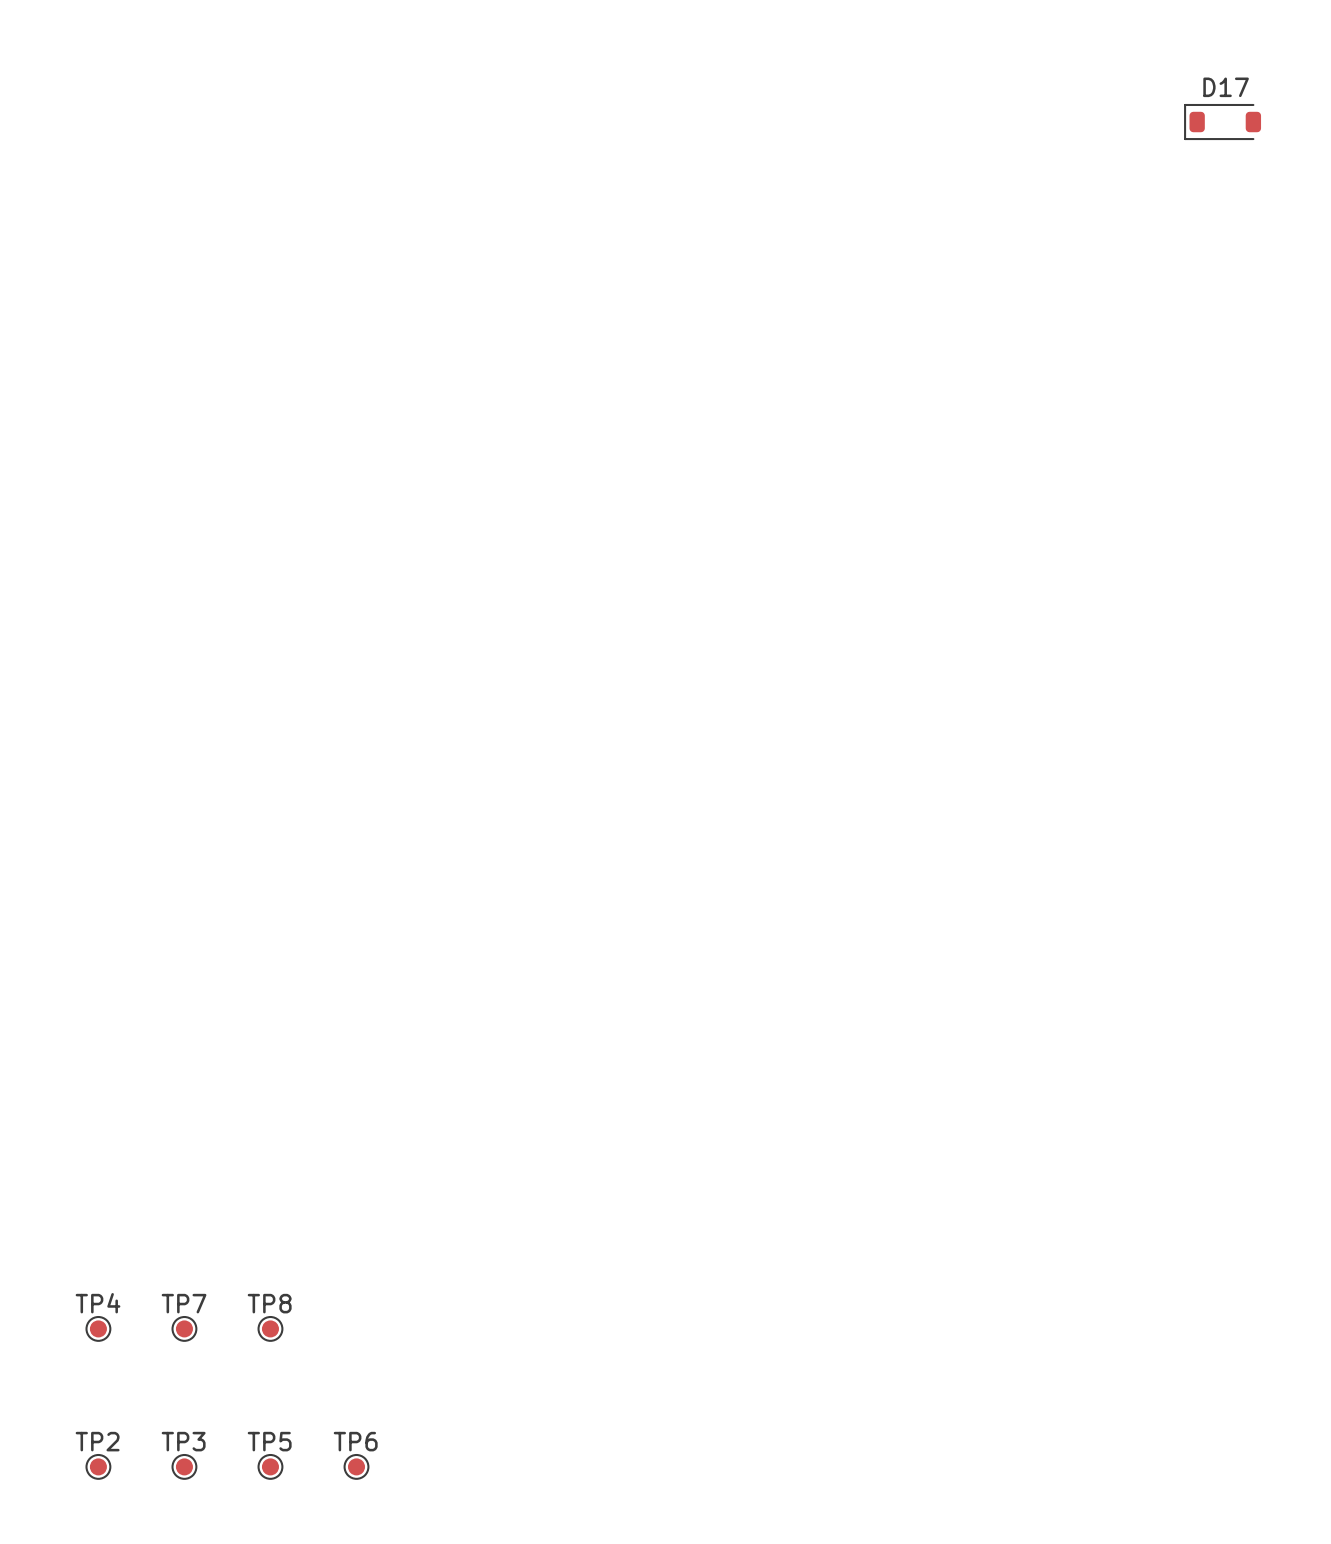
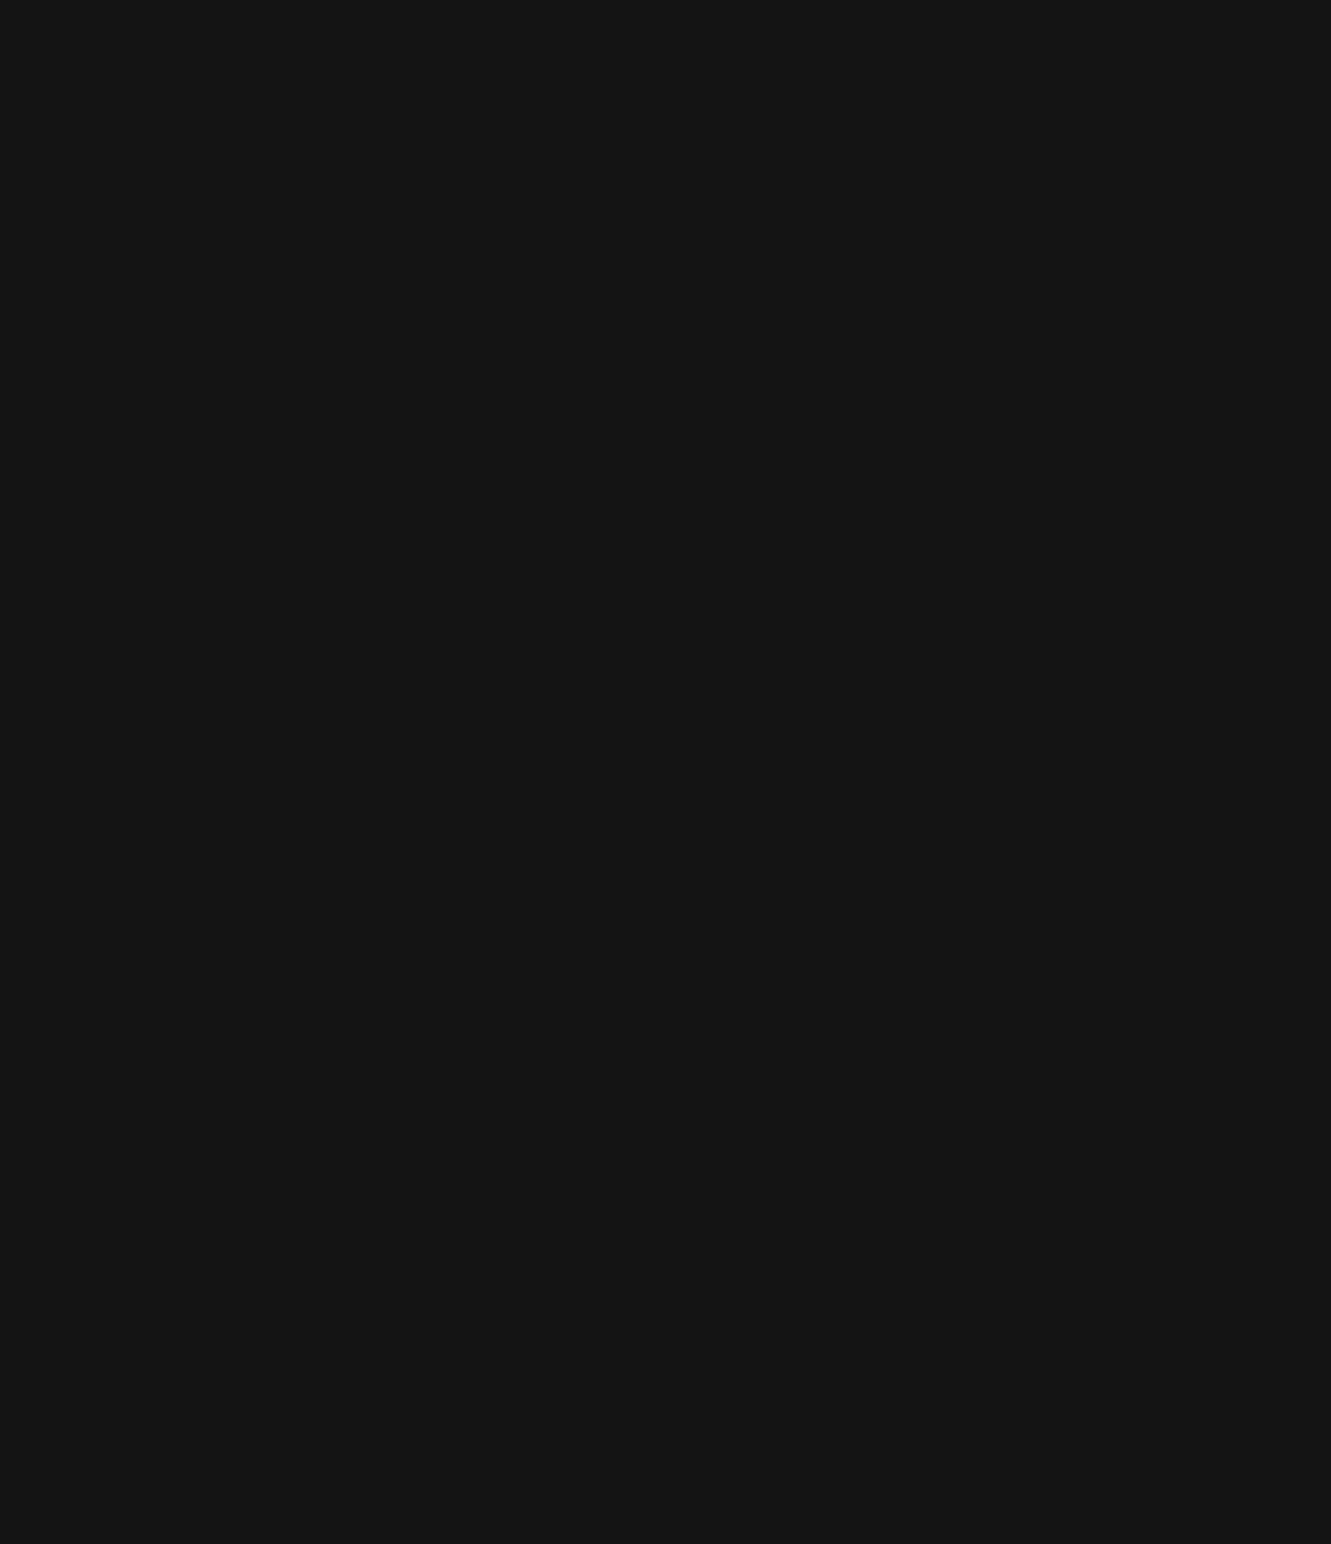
D17: (1222, 122) -> none
TP4: (98, 1328) -> none
TP7: (184, 1328) -> none
TP8: (270, 1328) -> none
TP2: (98, 1466) -> none
TP3: (184, 1466) -> none
TP5: (270, 1466) -> none
TP6: (356, 1466) -> none

